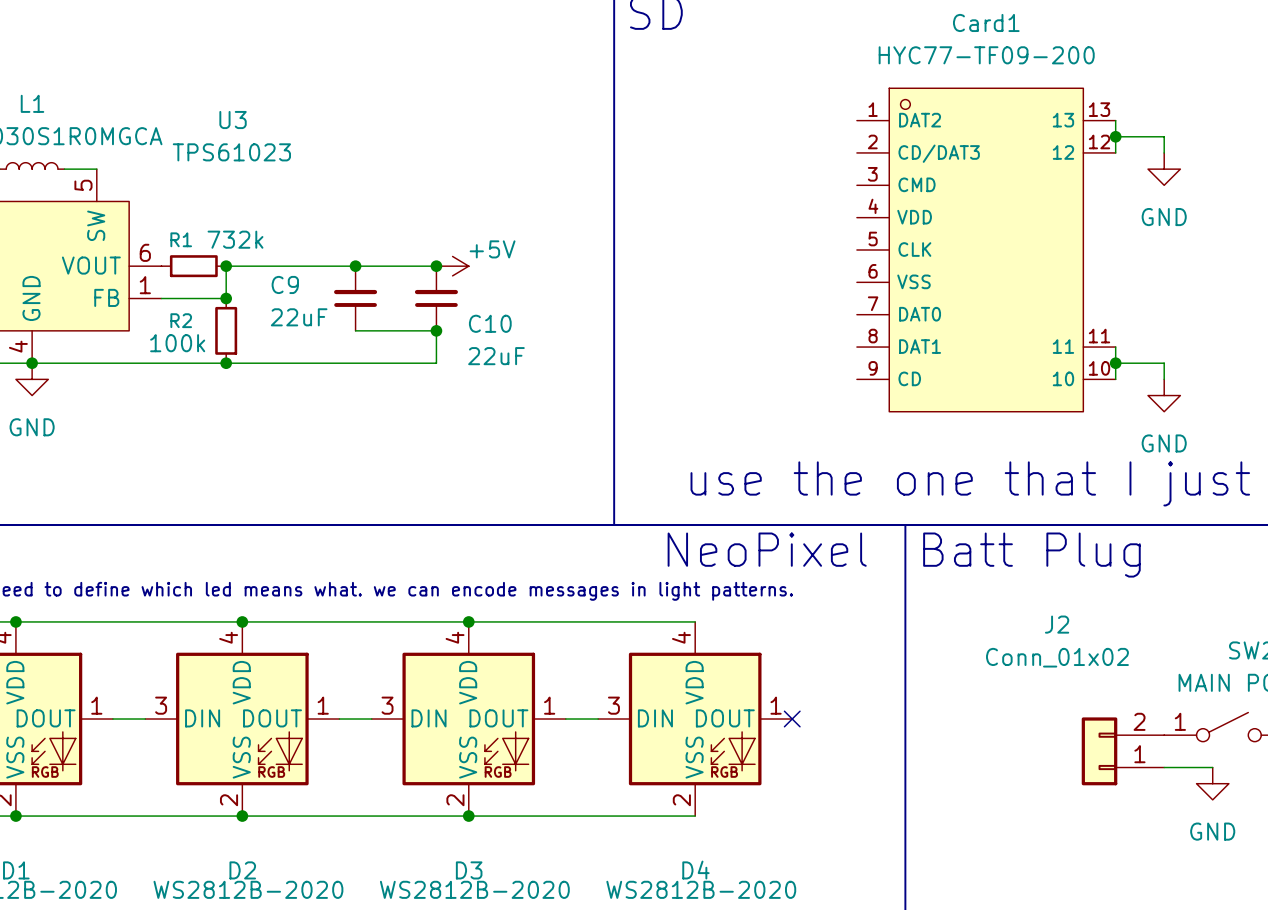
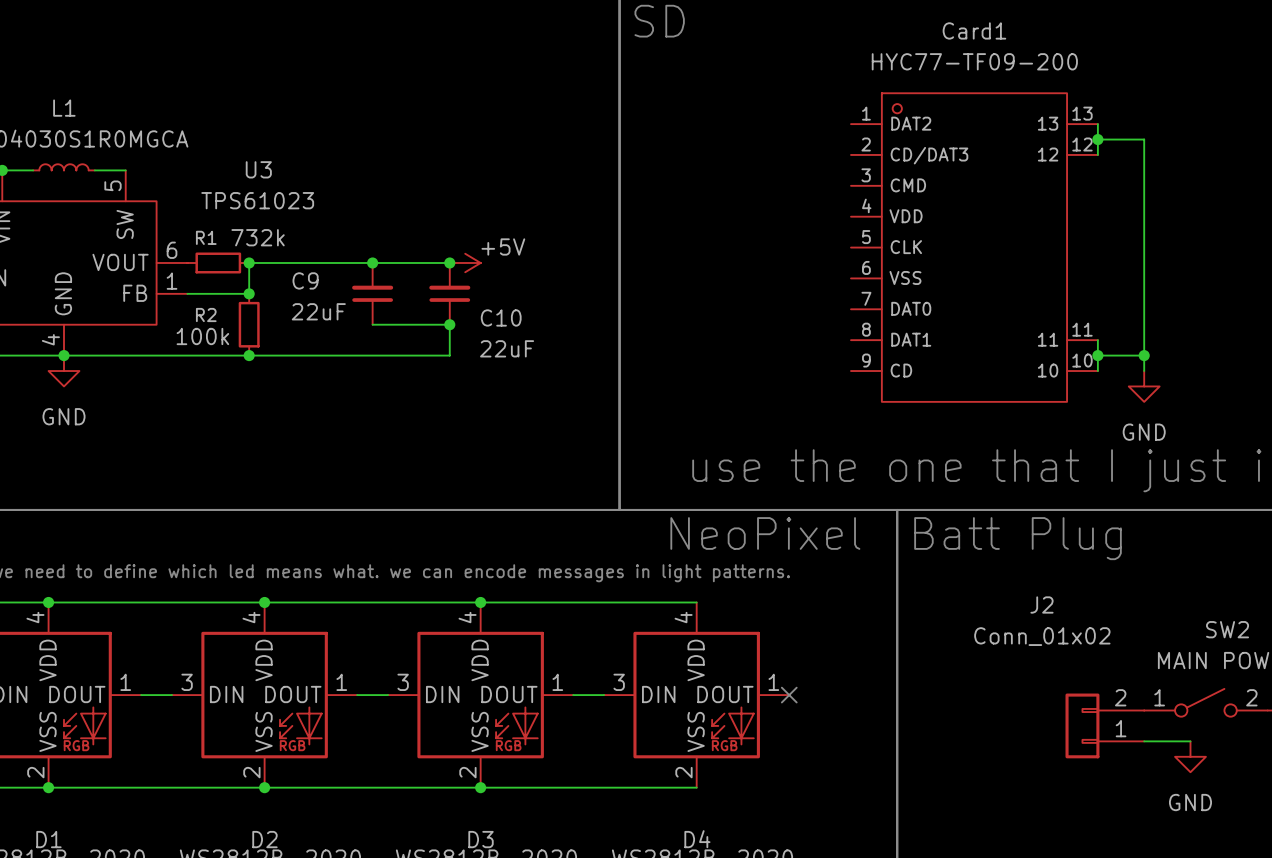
U3 name position: U3 (233, 120) -> U3 (258, 169)
U3 value position: TPS61023 (231, 152) -> TPS61023 (257, 200)
wire: none -> (1144, 154) (1144, 355)
power symbol: GND (1164, 169) -> none
junction: none -> (1144, 355)

